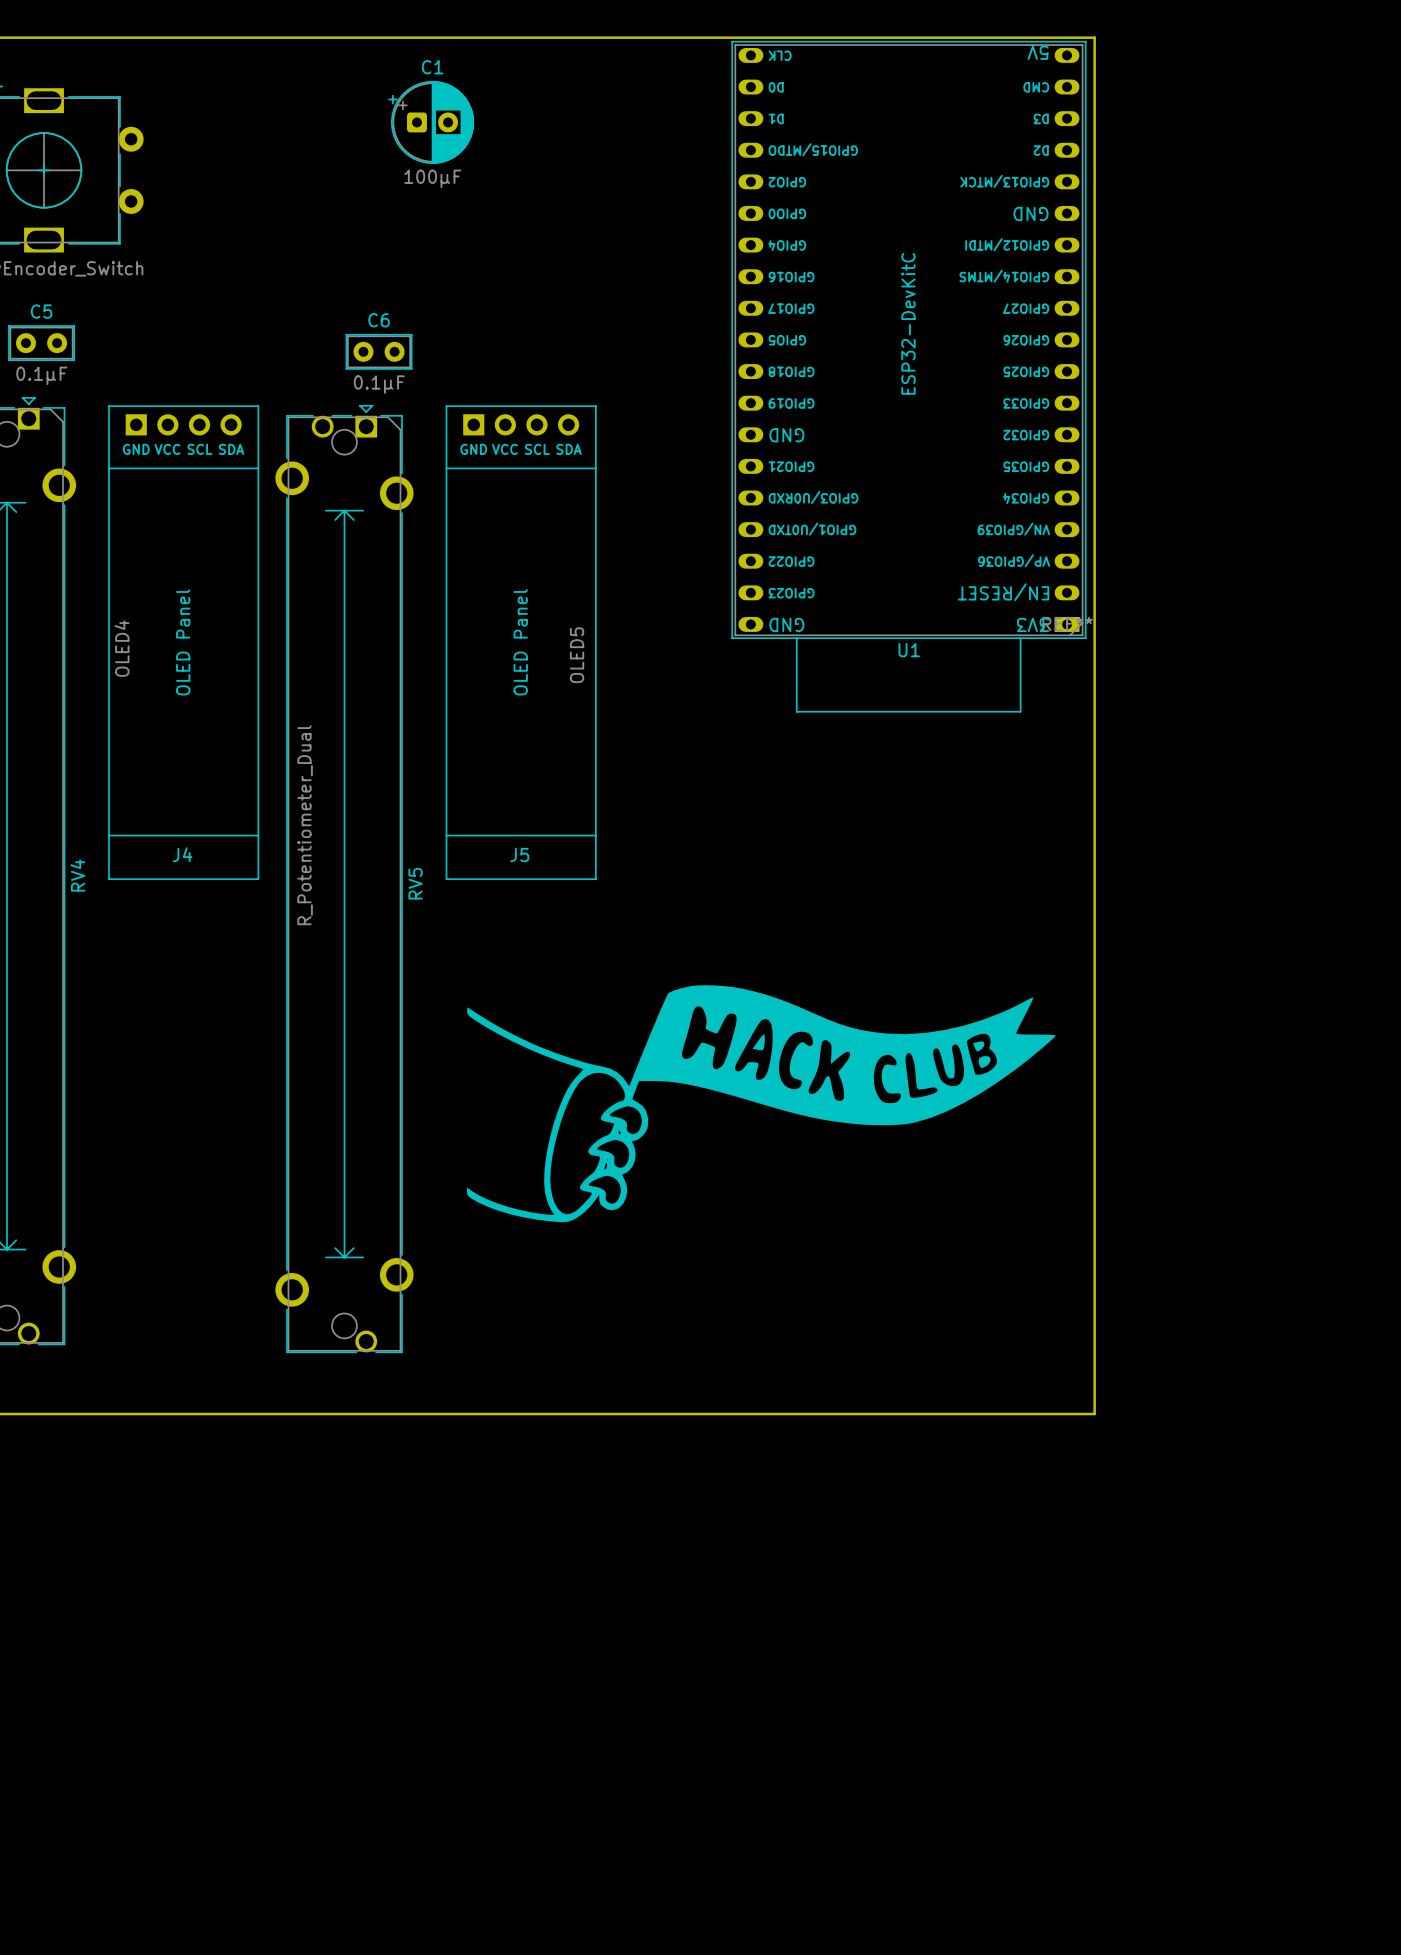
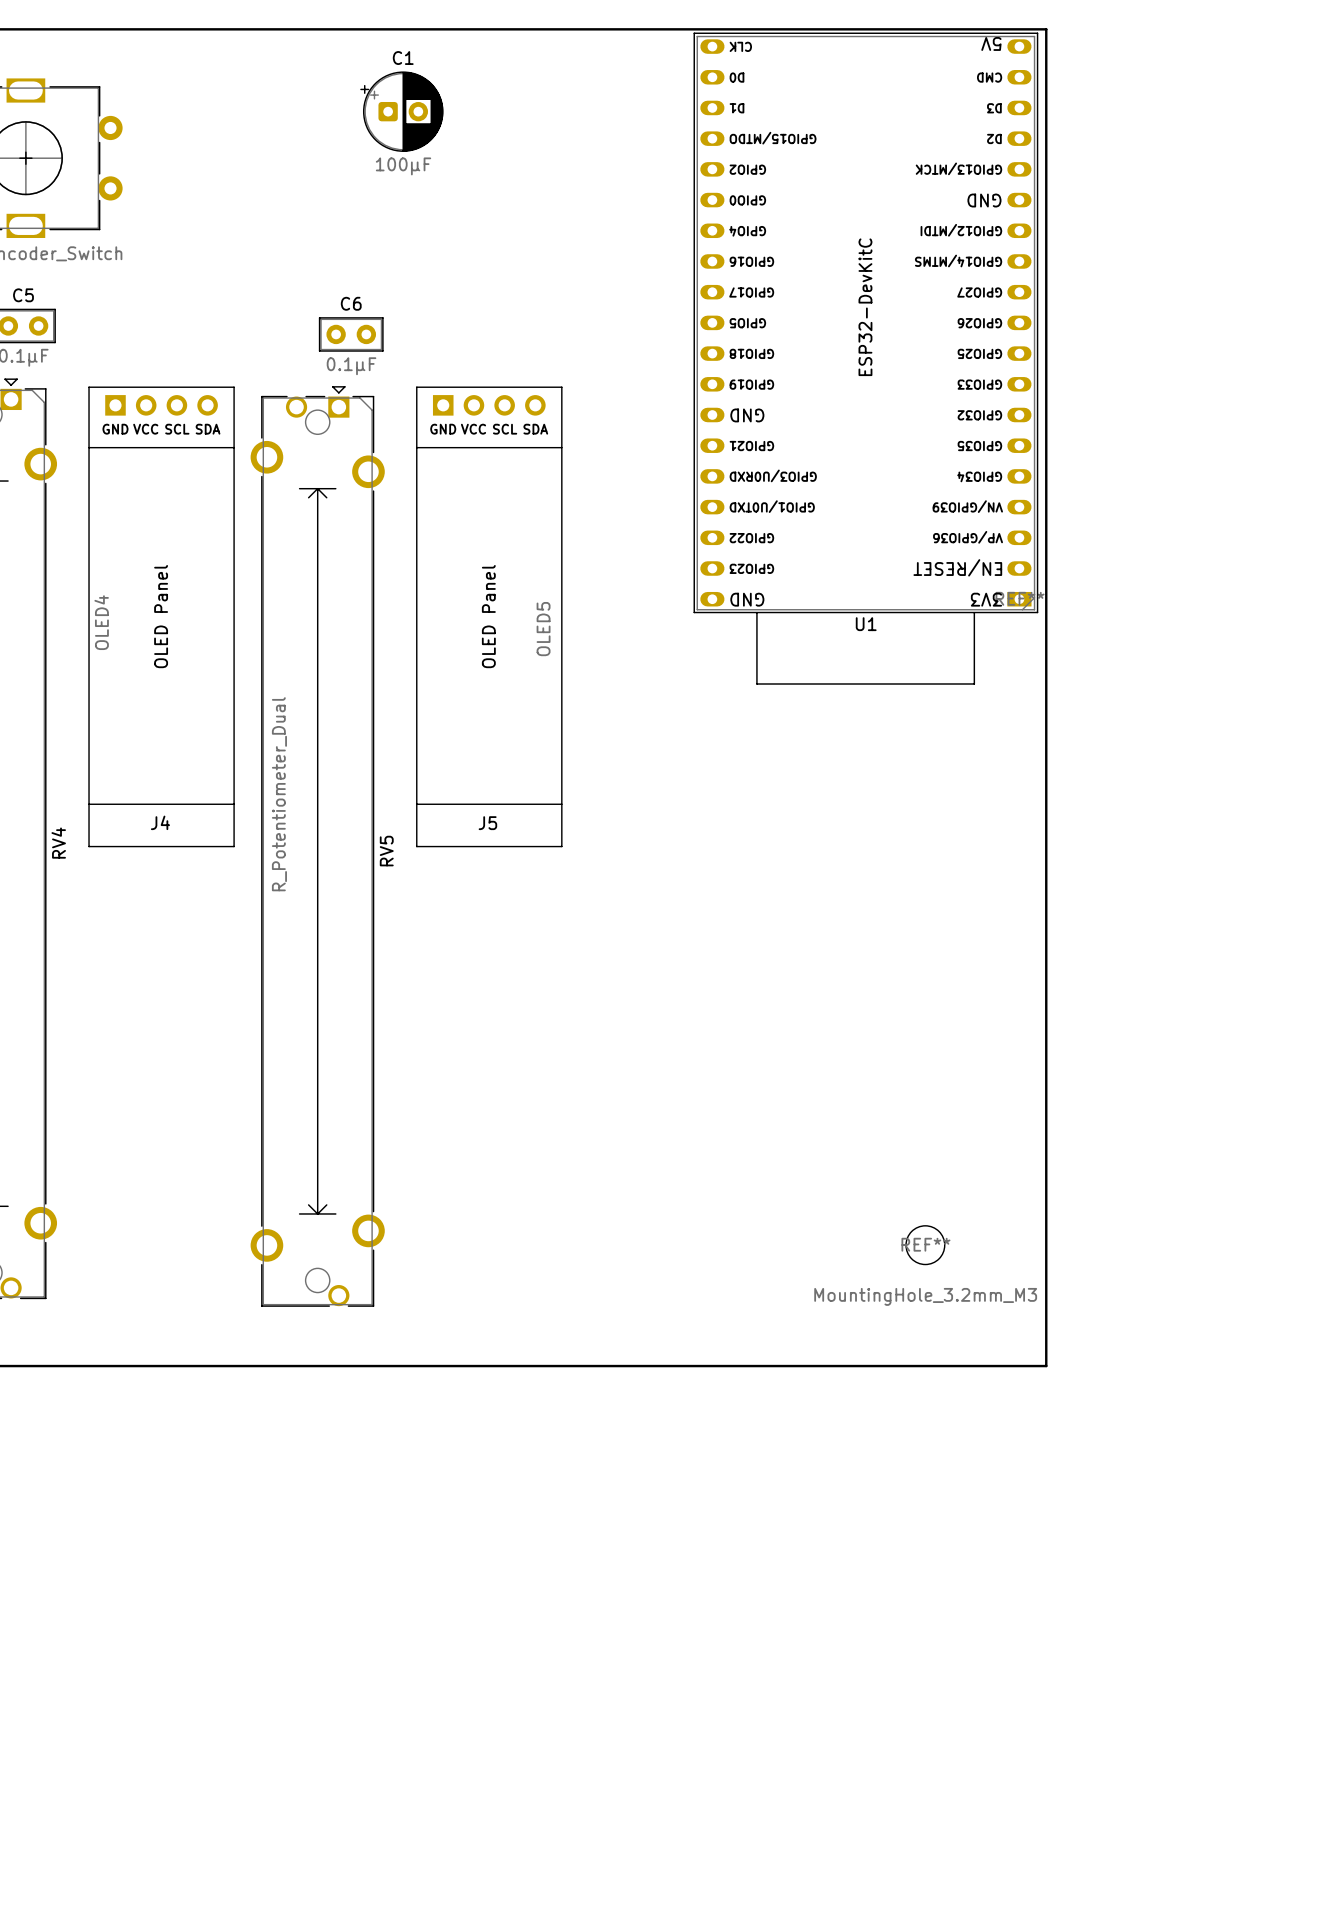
drawing: [467, 985, 1056, 1223] -> none
REF**: none -> MountingHole_3.2mm_M3 (925, 1245)

